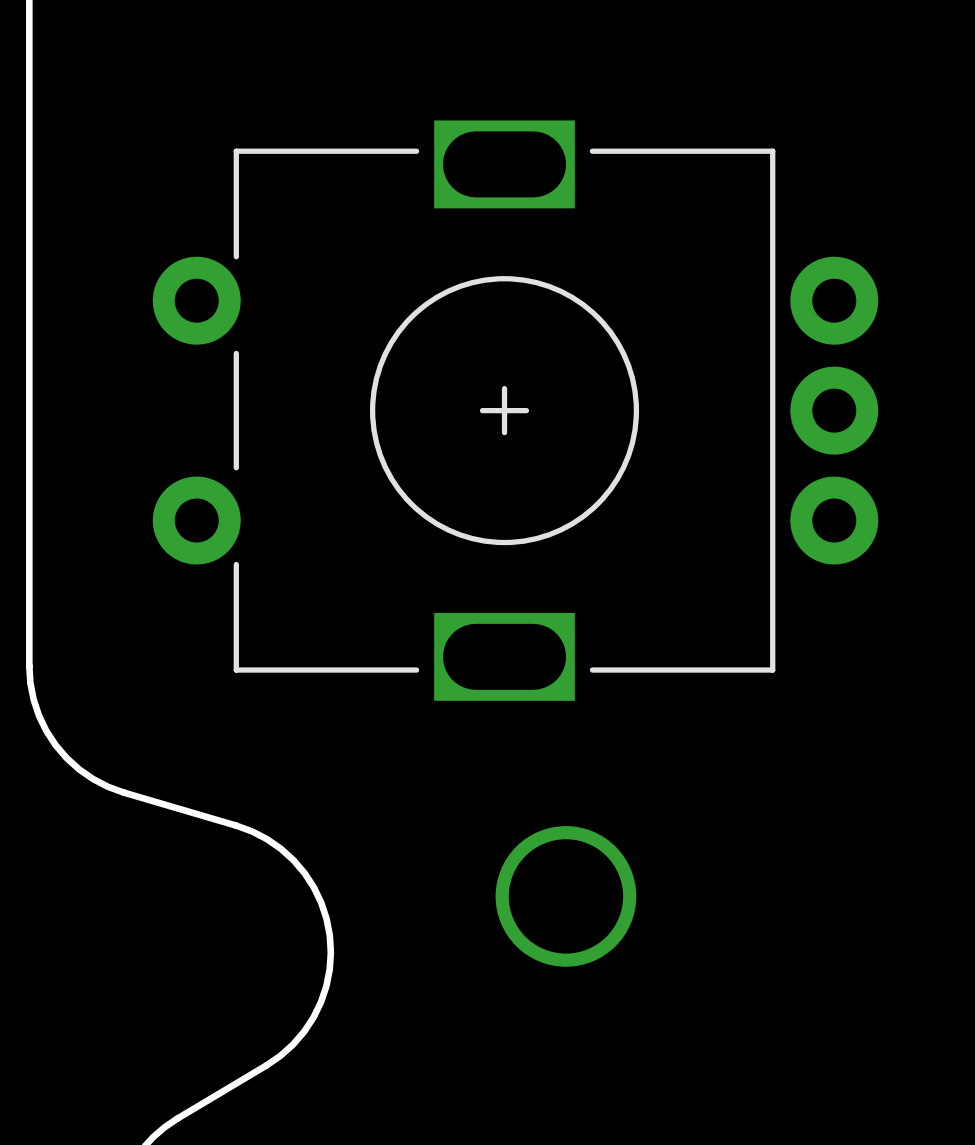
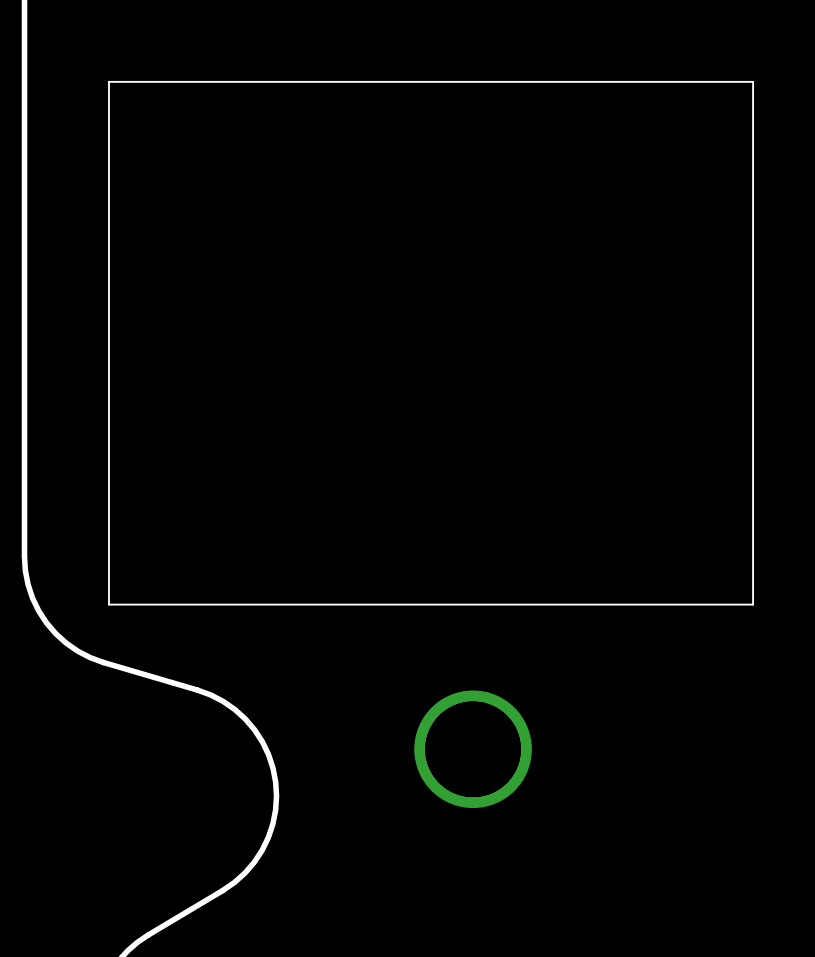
board edge: none -> (753, 81) (108, 81) (108, 604) (753, 604) (753, 81)
part: (515, 410) -> none
part: none -> (473, 749)

